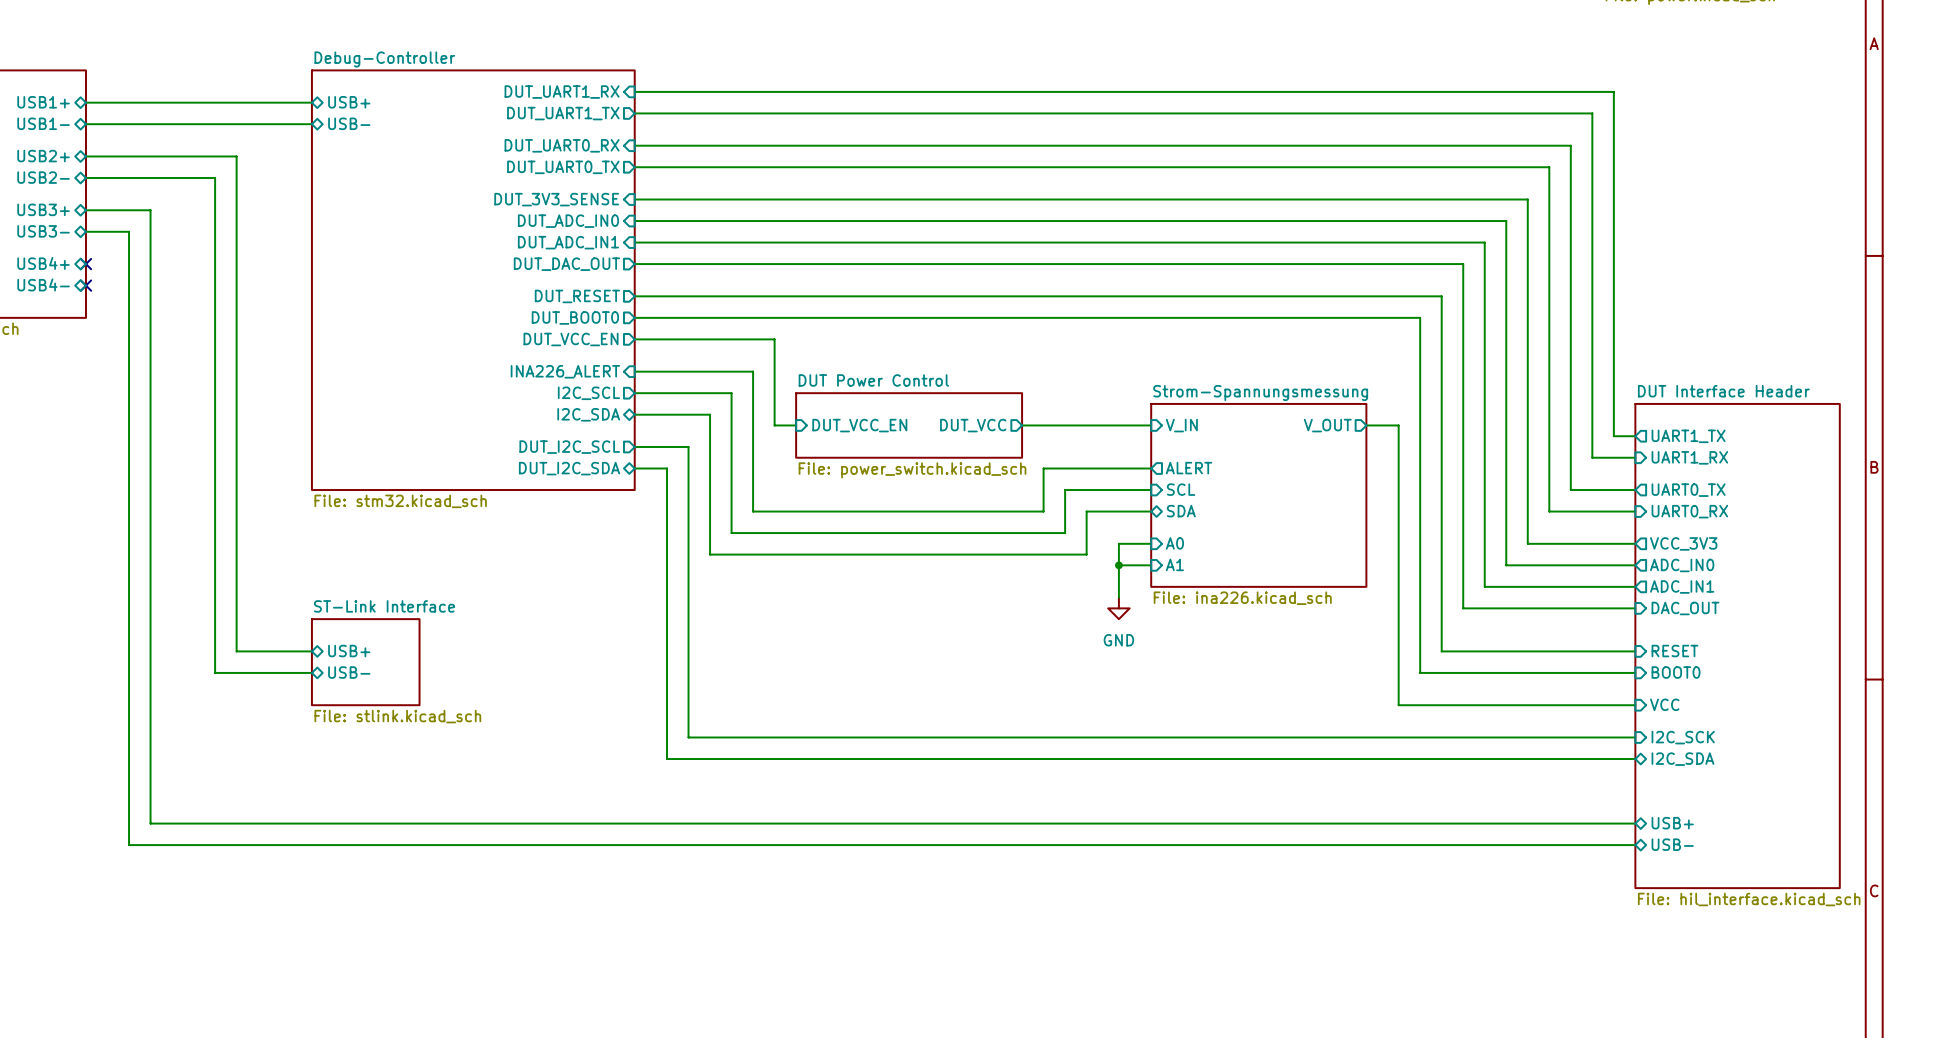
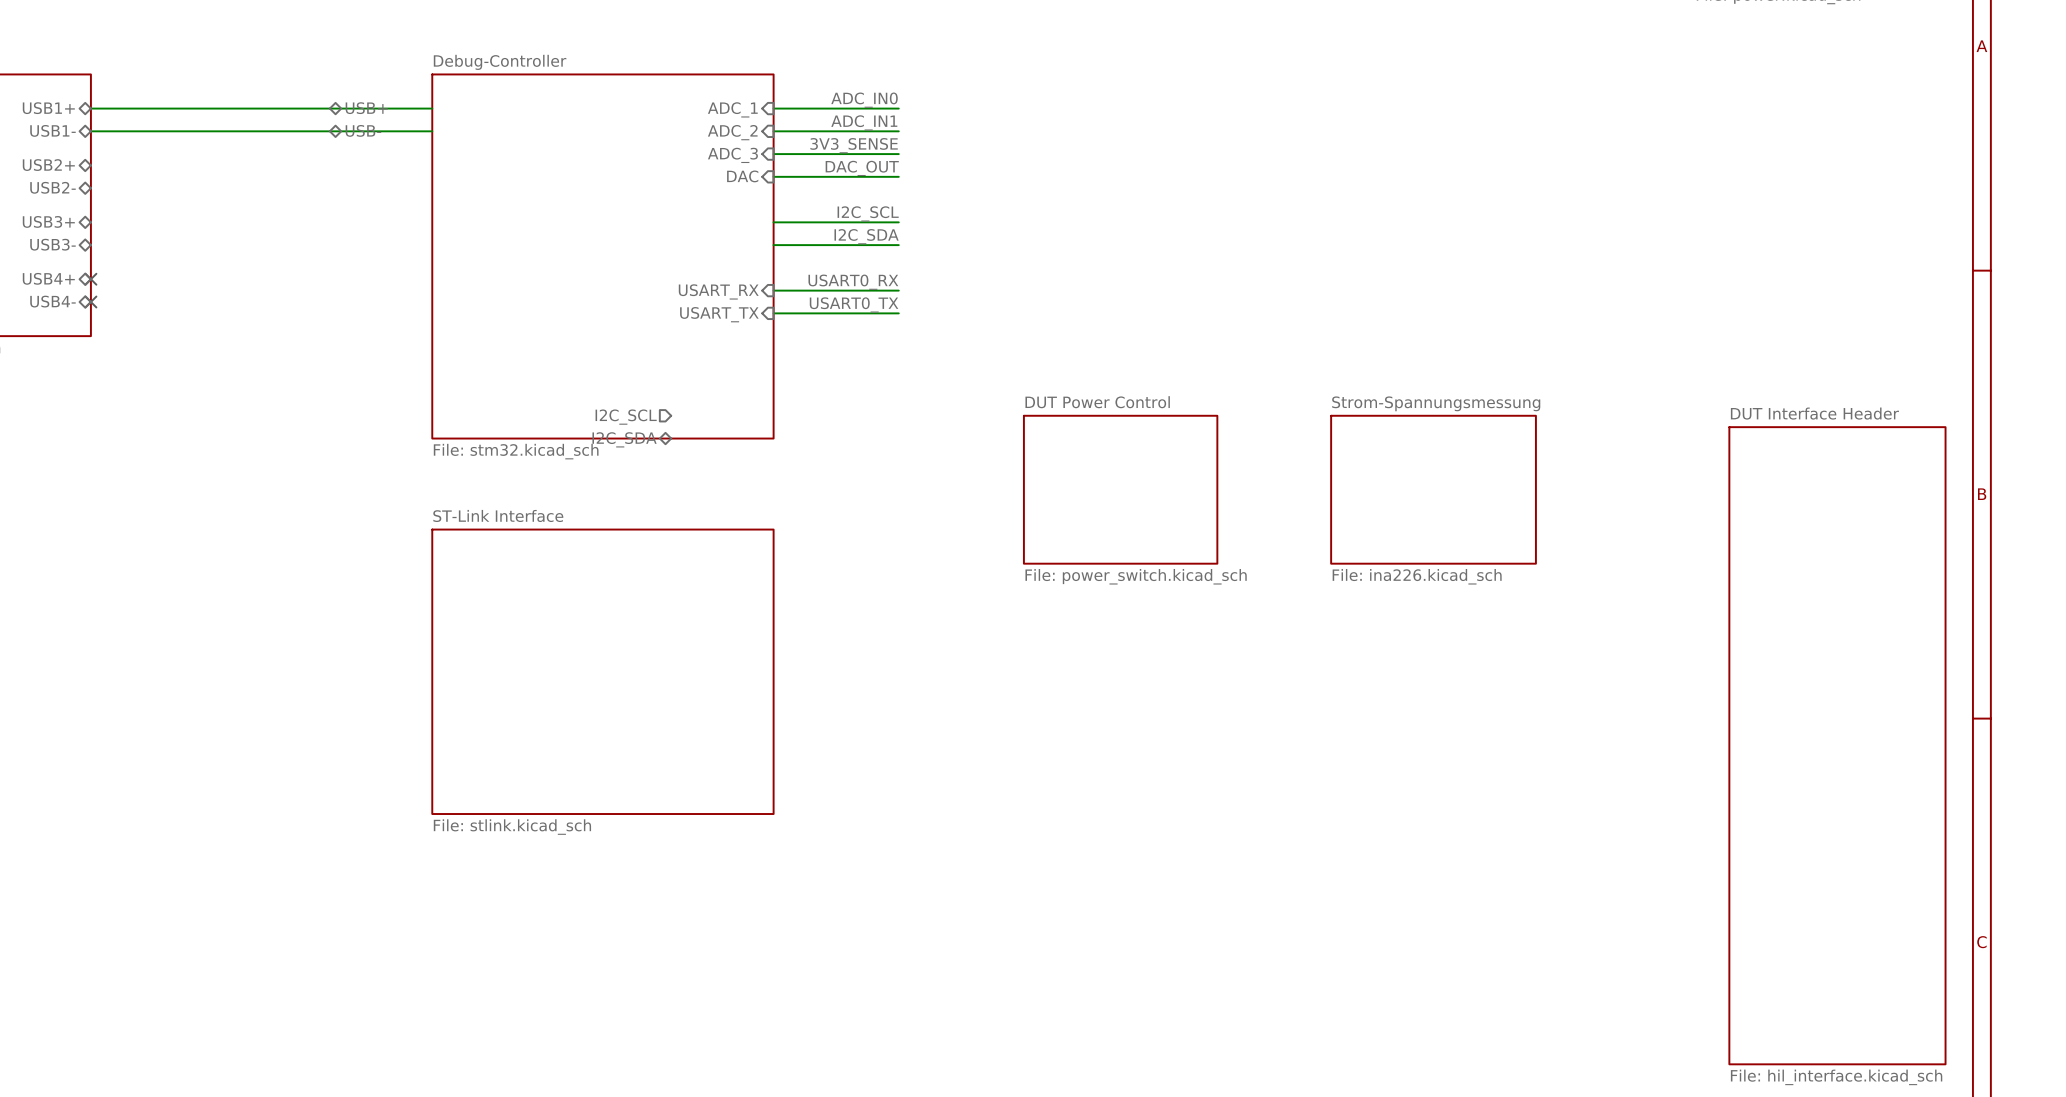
wire: (634, 91) (1613, 91) (1613, 436) (1635, 436) -> none
sheet pin: DUT_UART1_RX (562, 92) -> none
label: none -> ADC_IN0 (864, 100)
wire: none -> (329, 108) (432, 108)
sheet pin: none -> ADC_1 (732, 109)
wire: none -> (773, 108) (898, 108)
sheet pin: DUT_UART1_TX (563, 113) -> none
wire: (634, 113) (1592, 113) (1592, 457) (1635, 457) -> none
label: none -> ADC_IN1 (864, 122)
wire: none -> (329, 131) (432, 131)
sheet pin: none -> ADC_2 (732, 132)
wire: none -> (773, 131) (898, 131)
label: none -> 3V3_SENSE (854, 145)
sheet pin: DUT_UART0_RX (562, 145) -> none
wire: (634, 145) (731, 145) -> none
sheet pin: none -> ADC_3 (732, 155)
wire: (849, 145) (1570, 145) (1570, 490) (1635, 490) -> none
wire: (85, 156) (236, 156) (236, 651) (311, 651) -> none
label: none -> DAC_OUT (862, 168)
sheet pin: none -> DAC (742, 176)
sheet pin: DUT_UART0_TX (563, 167) -> none
wire: (634, 167) (731, 167) -> none
wire: (849, 167) (1549, 167) (1549, 511) (1635, 511) -> none
wire: (85, 177) (215, 177) (215, 672) (311, 672) -> none
sheet pin: DUT_3V3_SENSE (556, 199) -> none
wire: (634, 199) (1527, 199) (1527, 543) (1635, 543) -> none
label: none -> I2C_SCL (868, 213)
wire: (85, 210) (150, 210) (150, 823) (1635, 823) -> none
wire: none -> (773, 222) (898, 222)
sheet pin: DUT_ADC_IN0 (568, 221) -> none
wire: (634, 221) (1506, 221) (1506, 565) (1635, 565) -> none
label: none -> I2C_SDA (866, 236)
wire: (85, 231) (129, 231) (129, 845) (1635, 845) -> none
wire: none -> (773, 245) (898, 245)
sheet pin: DUT_ADC_IN1 (568, 242) -> none
sheet Debug-Controller: none -> File: stm32.kicad_sch (602, 256)
wire: (634, 242) (1484, 242) (1484, 586) (1635, 586) -> none
sheet pin: DUT_DAC_OUT (566, 264) -> none
wire: (634, 264) (1463, 264) (1463, 608) (1635, 608) -> none
label: none -> USART0_RX (853, 282)
sheet pin: none -> USART_RX (718, 291)
wire: none -> (773, 290) (898, 290)
sheet Debug-Controller: File: stm32.kicad_sch (473, 280) -> none
label: none -> USART0_TX (854, 304)
sheet pin: DUT_RESET (577, 296) -> none
wire: (634, 296) (731, 296) -> none
sheet pin: none -> USART_TX (719, 314)
wire: (849, 296) (1441, 296) (1441, 651) (1635, 651) -> none
sheet pin: DUT_BOOT0 (575, 317) -> none
wire: (634, 317) (1420, 317) (1420, 672) (1635, 672) -> none
sheet pin: DUT_VCC_EN (571, 339) -> none
wire: (634, 339) (774, 339) (774, 425) (796, 425) -> none
sheet pin: INA226_ALERT (565, 371) -> none
wire: (634, 371) (753, 371) (753, 511) (1043, 511) (1043, 468) (1151, 468) -> none
wire: (634, 393) (731, 393) (731, 533) (1065, 533) (1065, 490) (1151, 490) -> none
wire: (634, 414) (710, 414) (710, 554) (1086, 554) (1086, 511) (1151, 511) -> none
sheet pin: DUT_VCC_EN (859, 425) -> none
sheet DUT Power Control: File: power_switch.kicad_sch (909, 425) -> none
sheet pin: DUT_VCC (973, 425) -> none
wire: (1022, 425) (1151, 425) -> none
sheet pin: V_IN (1181, 425) -> none
sheet pin: V_OUT (1327, 425) -> none
wire: (1366, 425) (1398, 425) (1398, 705) (1635, 705) -> none
sheet pin: UART1_TX (1688, 436) -> none
wire: (634, 446) (688, 446) (688, 737) (1635, 737) -> none
sheet pin: DUT_I2C_SCL (569, 447) -> none
sheet pin: UART1_RX (1689, 457) -> none
sheet DUT Power Control: none -> File: power_switch.kicad_sch (1120, 489)
sheet Strom-Spannungsmessung: none -> File: ina226.kicad_sch (1433, 489)
sheet pin: DUT_I2C_SDA (569, 468) -> none
wire: (634, 468) (667, 468) (667, 759) (1635, 759) -> none
sheet pin: ALERT (1189, 468) -> none
sheet pin: SCL (1181, 489) -> none
sheet pin: UART0_TX (1688, 490) -> none
sheet Strom-Spannungsmessung: File: ina226.kicad_sch (1258, 495) -> none
sheet pin: SDA (1181, 511) -> none
sheet pin: UART0_RX (1689, 511) -> none
wire: (1151, 543) (1118, 543) (1118, 597) -> none
sheet pin: A0 (1174, 543) -> none
sheet pin: VCC_3V3 (1683, 543) -> none
sheet pin: A1 (1174, 564) -> none
wire: (1118, 565) (1151, 565) -> none
junction: (1118, 565) -> none
sheet pin: ADC_IN0 (1682, 565) -> none
sheet pin: ADC_IN1 (1682, 586) -> none
power symbol: GND (1118, 608) -> none
sheet pin: DAC_OUT (1685, 608) -> none
sheet ST-Link Interface: none -> File: stlink.kicad_sch (602, 671)
sheet DUT Interface Header: File: hil_interface.kicad_sch (1737, 646) -> none
sheet pin: USB+ (349, 651) -> none
sheet pin: RESET (1675, 651) -> none
sheet ST-Link Interface: File: stlink.kicad_sch (365, 662) -> none
sheet pin: USB- (349, 672) -> none
sheet pin: BOOT0 (1676, 672) -> none
sheet pin: VCC (1664, 704) -> none
sheet DUT Interface Header: none -> File: hil_interface.kicad_sch (1837, 745)
sheet pin: I2C_SCK (1683, 737) -> none
sheet pin: I2C_SDA (1682, 759) -> none
sheet pin: USB+ (1672, 823) -> none
sheet pin: USB- (1672, 844) -> none

